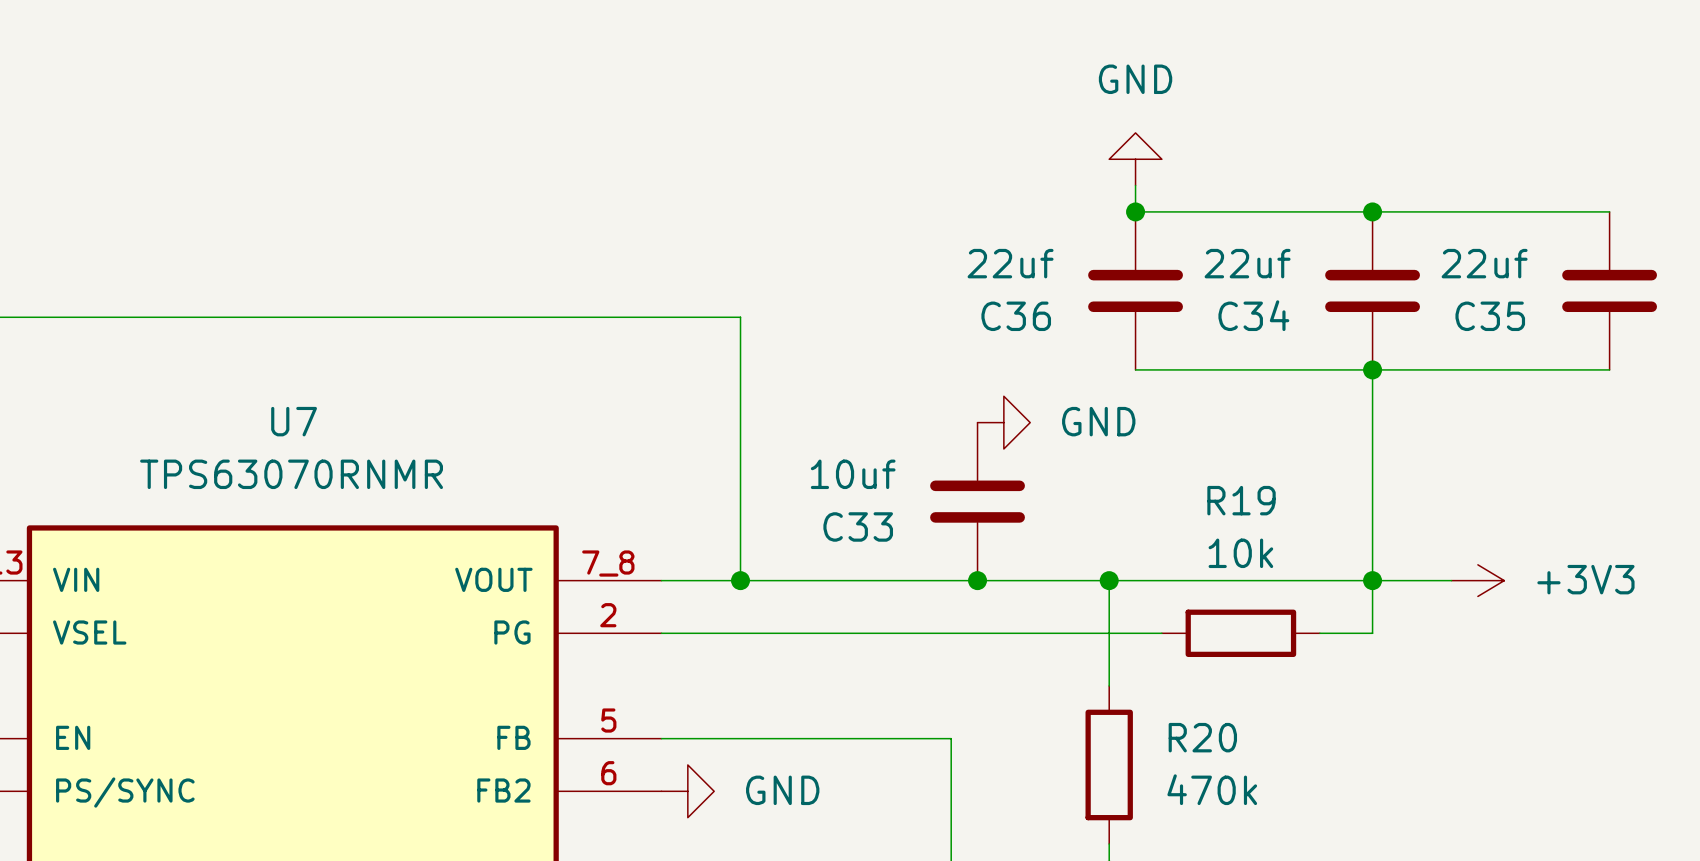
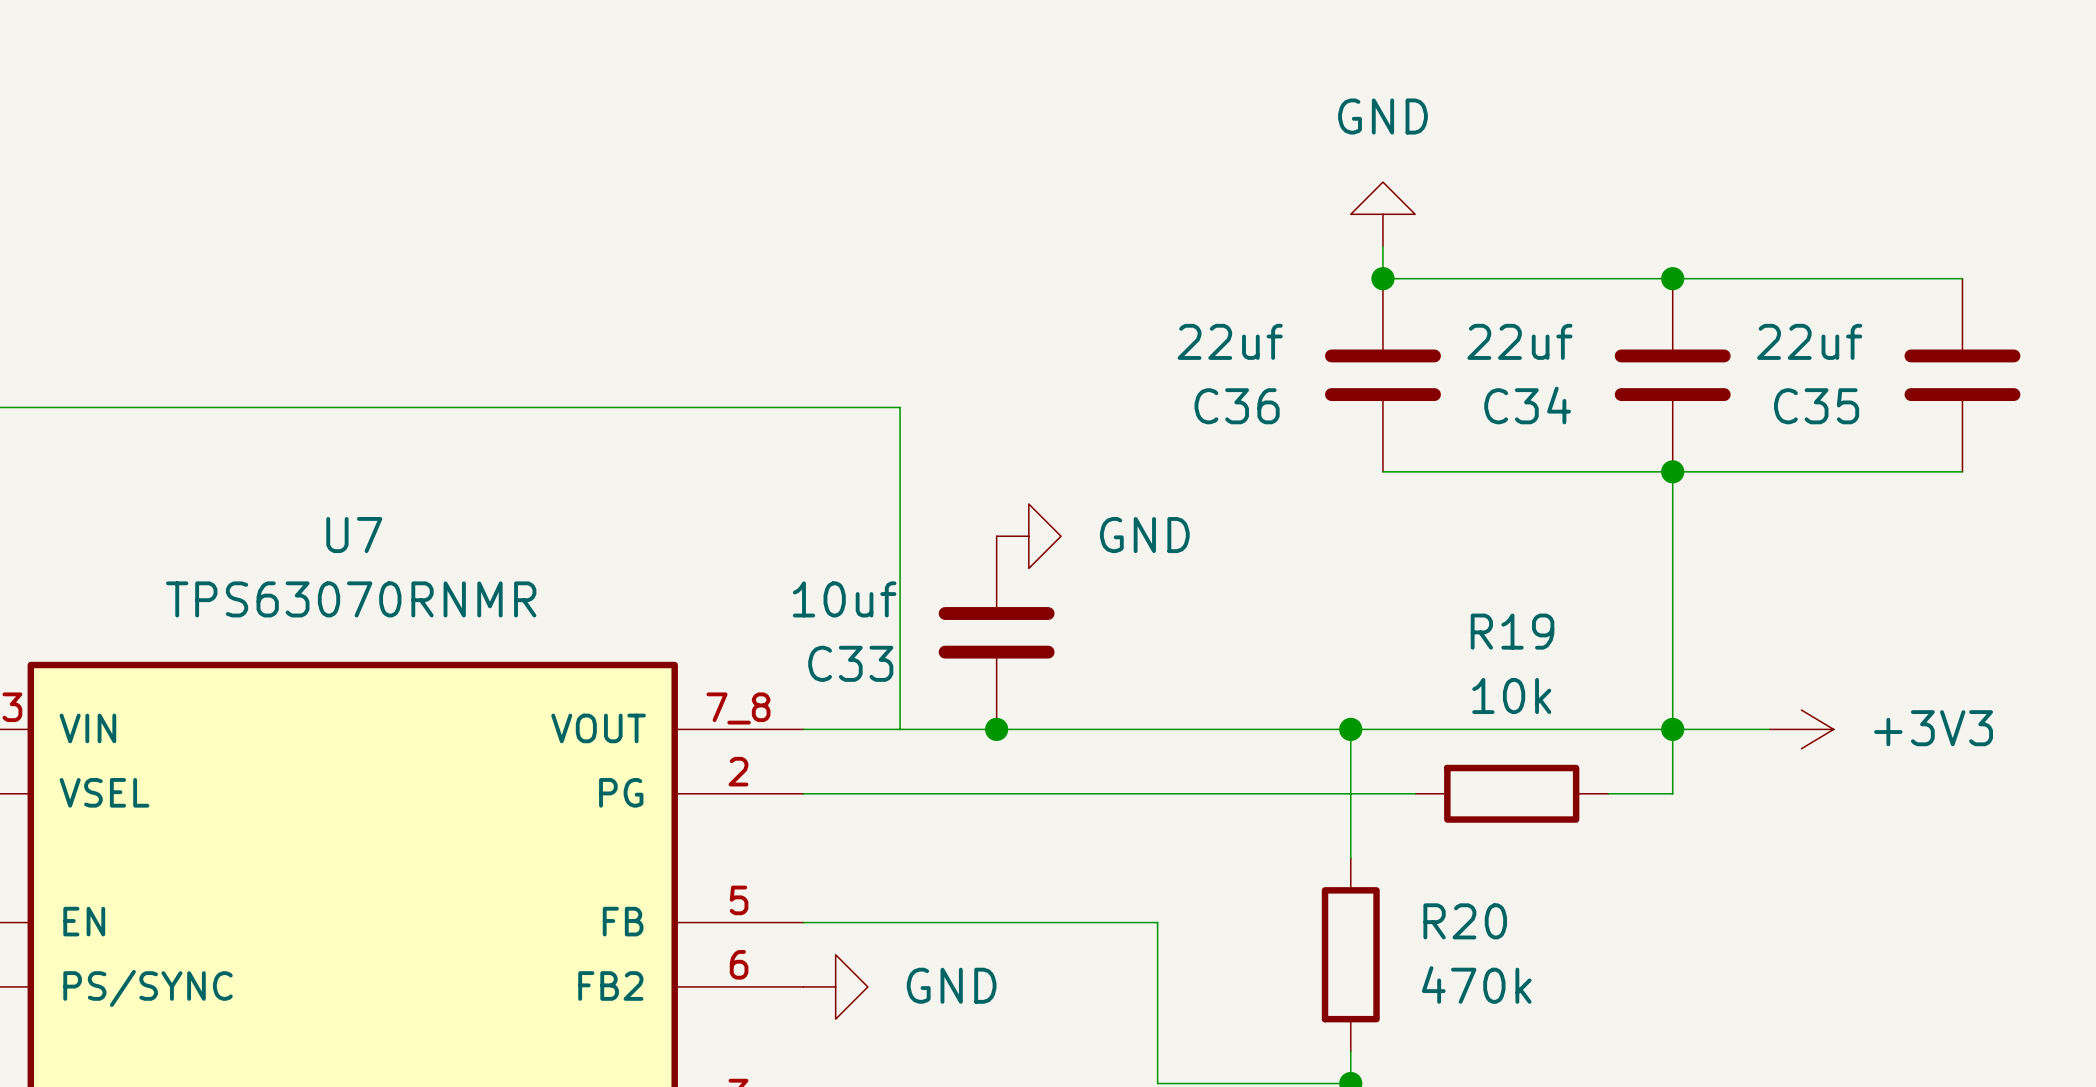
power symbol position: GND (1003, 422) -> GND (1028, 536)
C33 position: (977, 501) -> (996, 632)
junction: (740, 580) -> none
junction: none -> (996, 729)
junction: (977, 580) -> none

